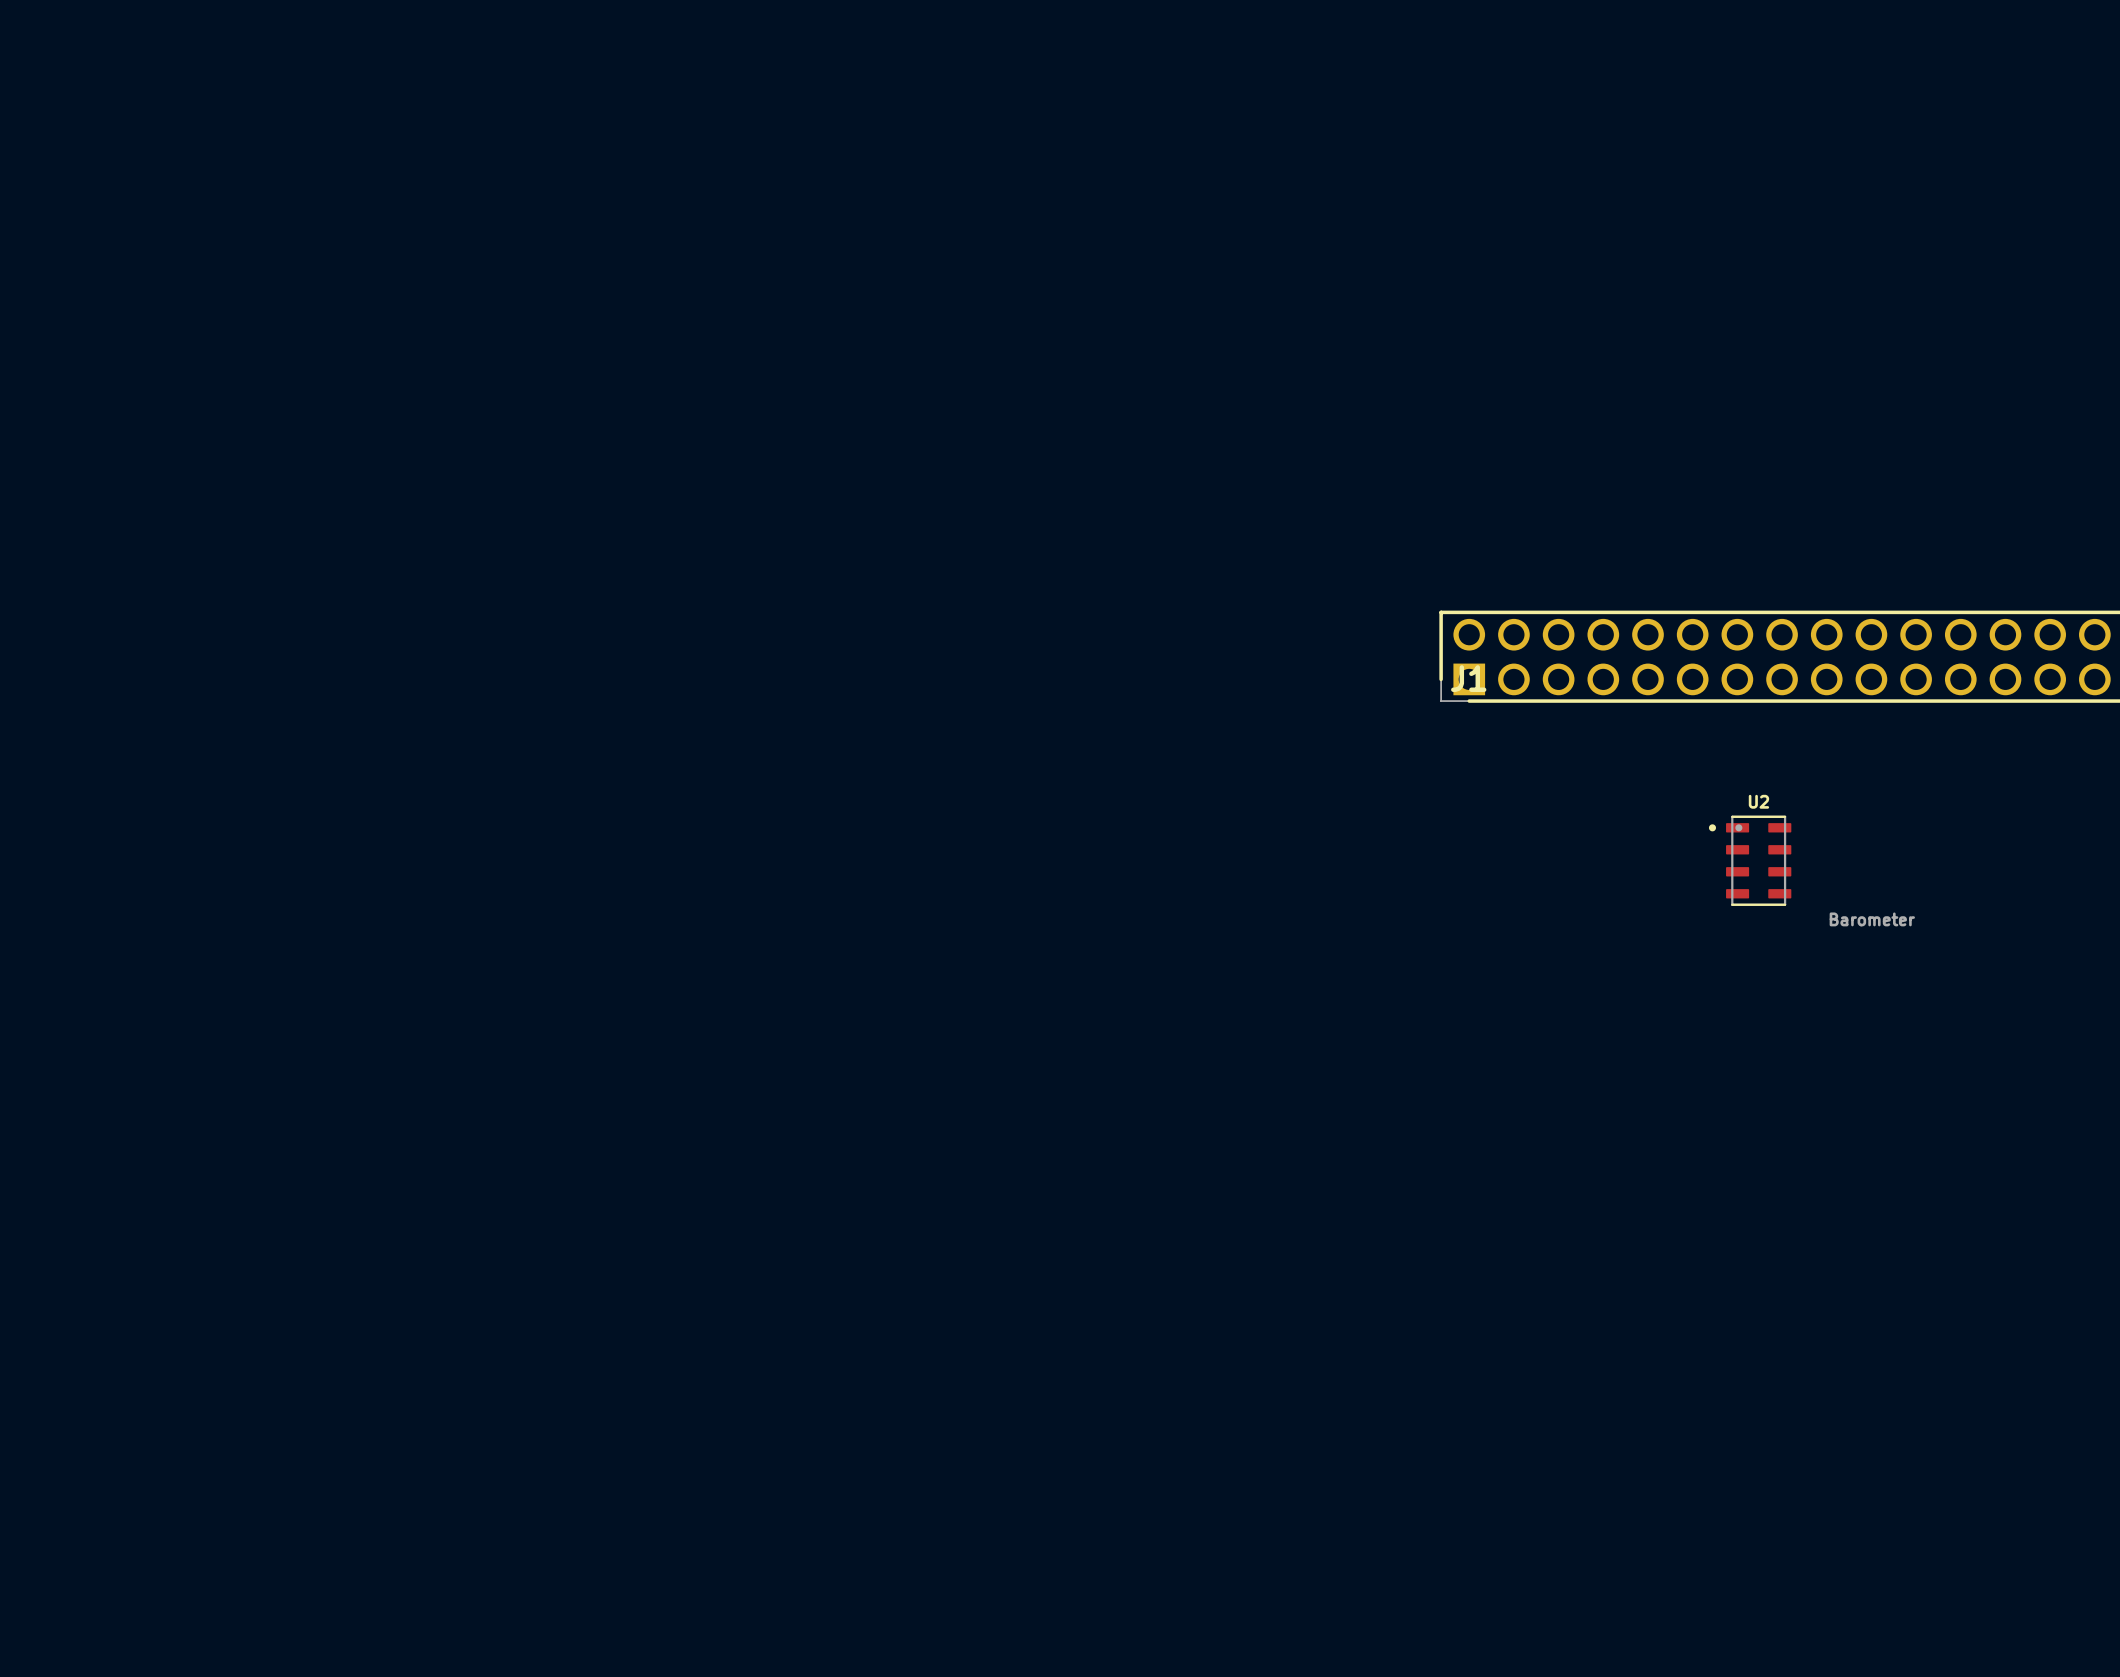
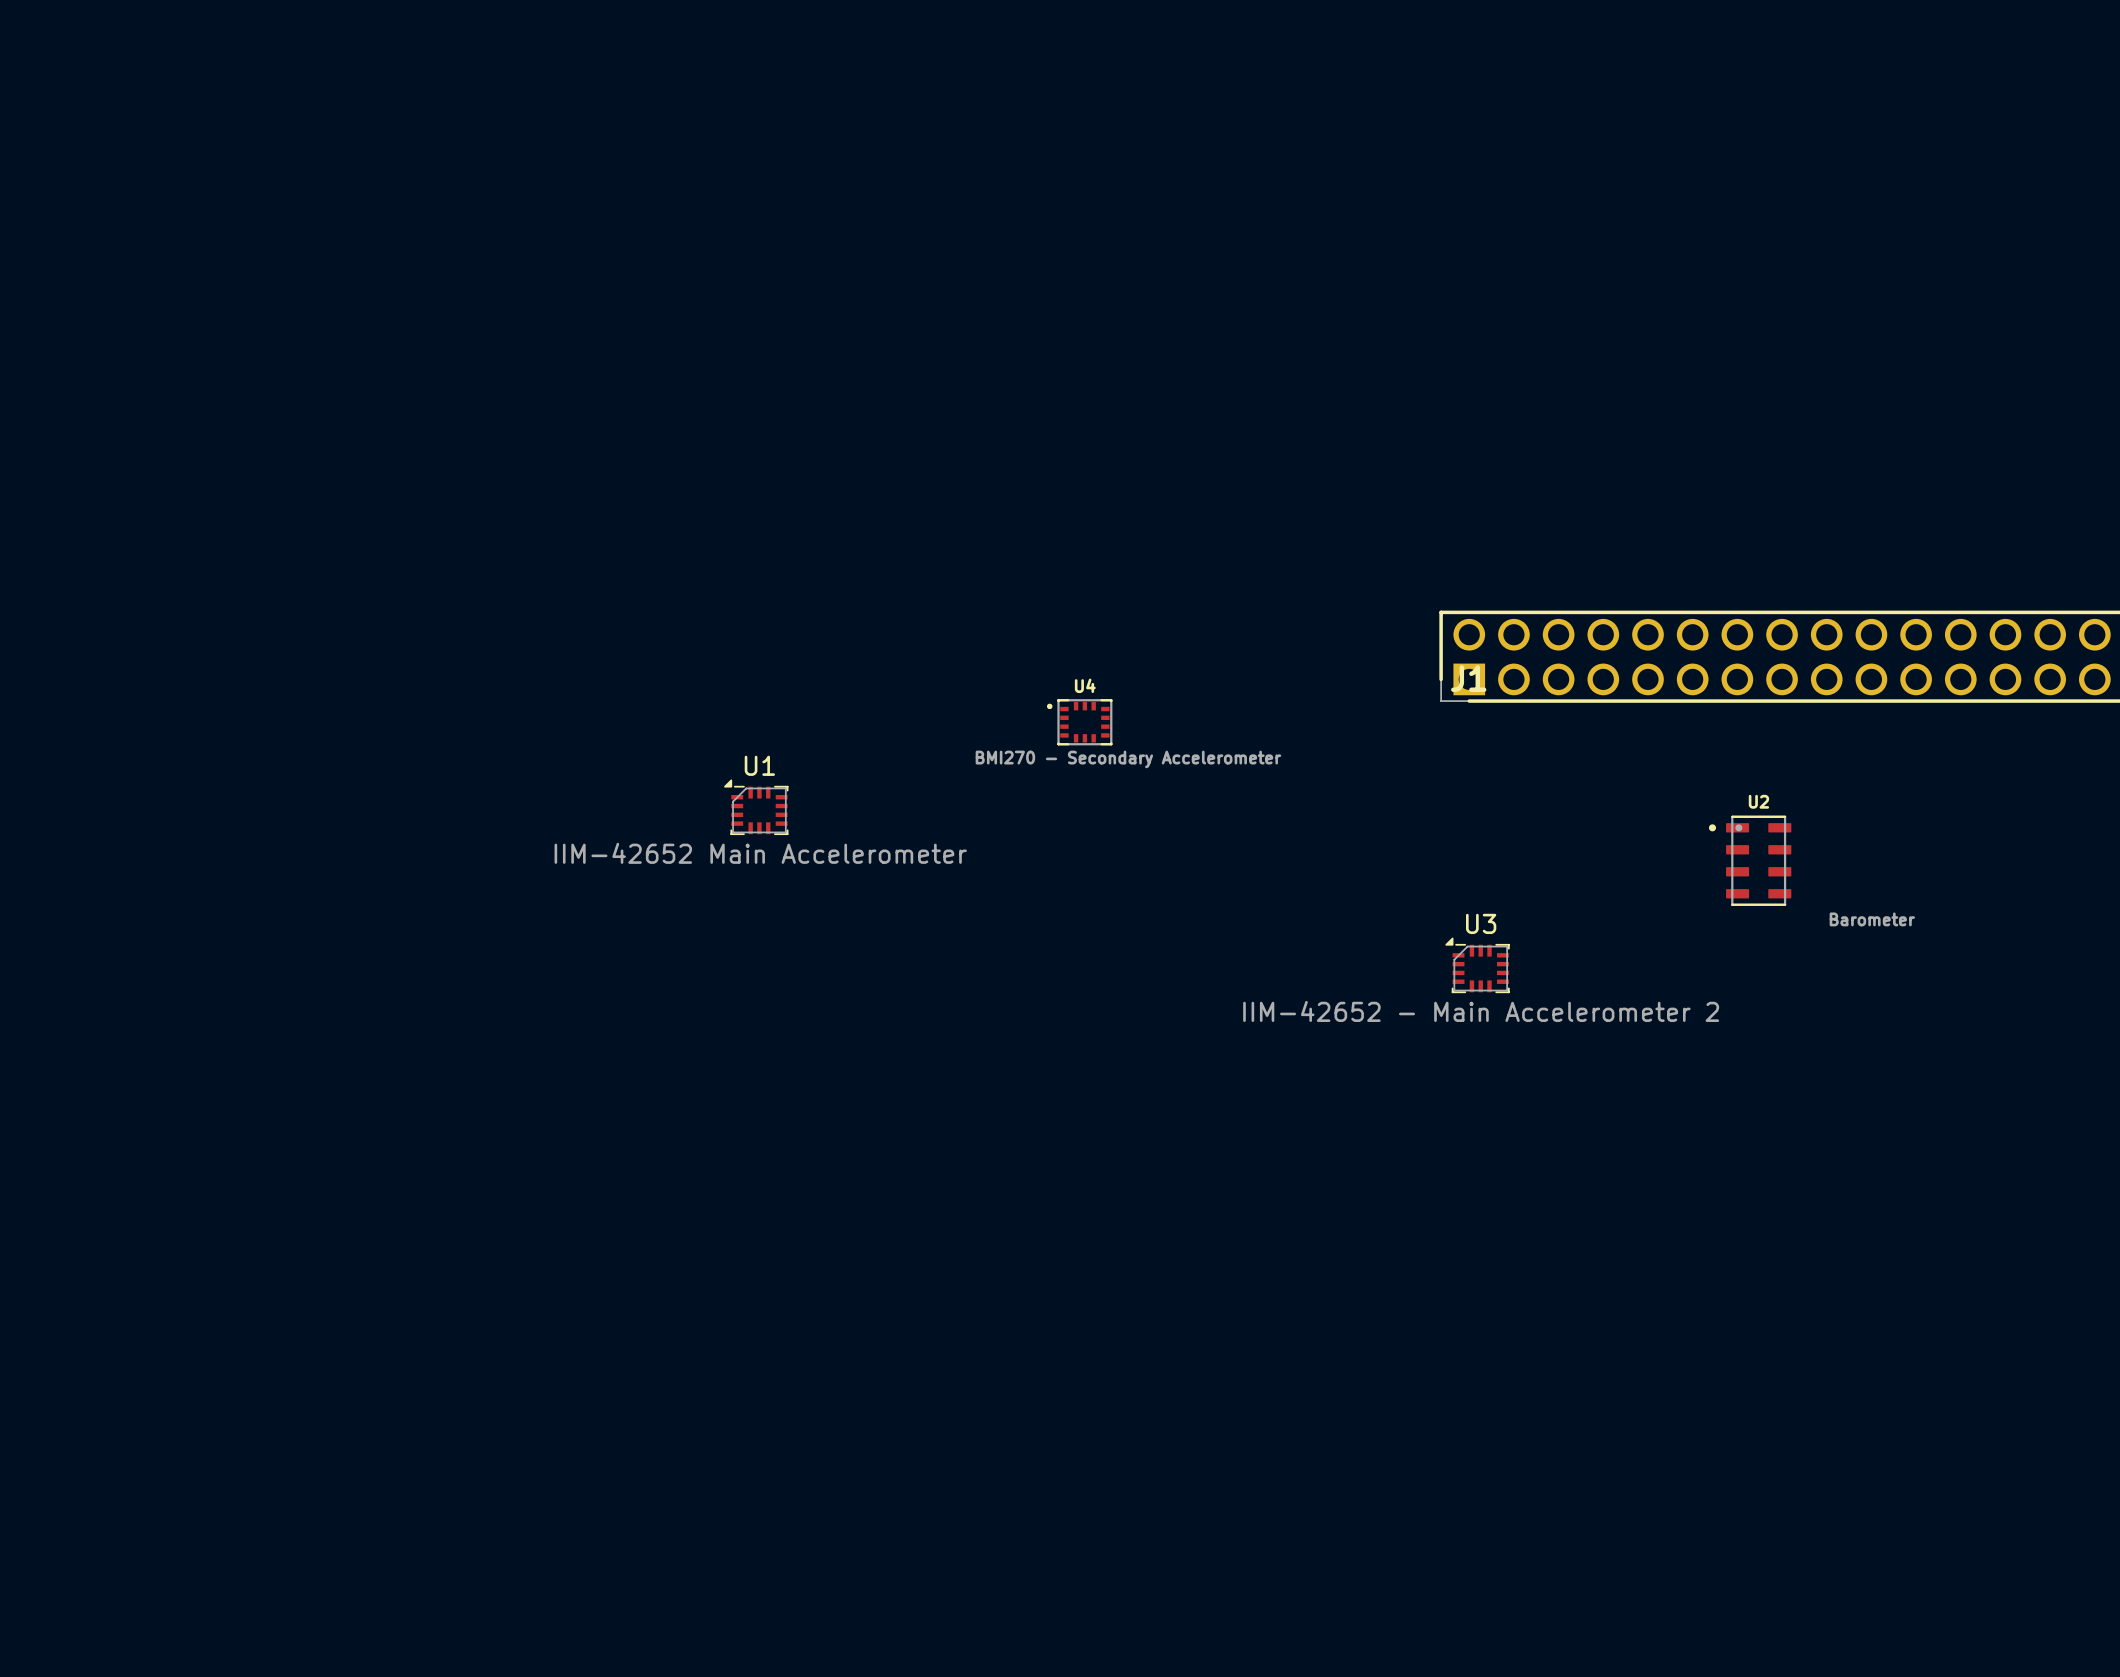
U4: none -> BMI270 - Secondary Accelerometer (1079, 722)
U1: none -> IIM-42652 Main Accelerometer (756, 807)
U3: none -> IIM-42652 - Main Accelerometer 2 (1477, 965)

